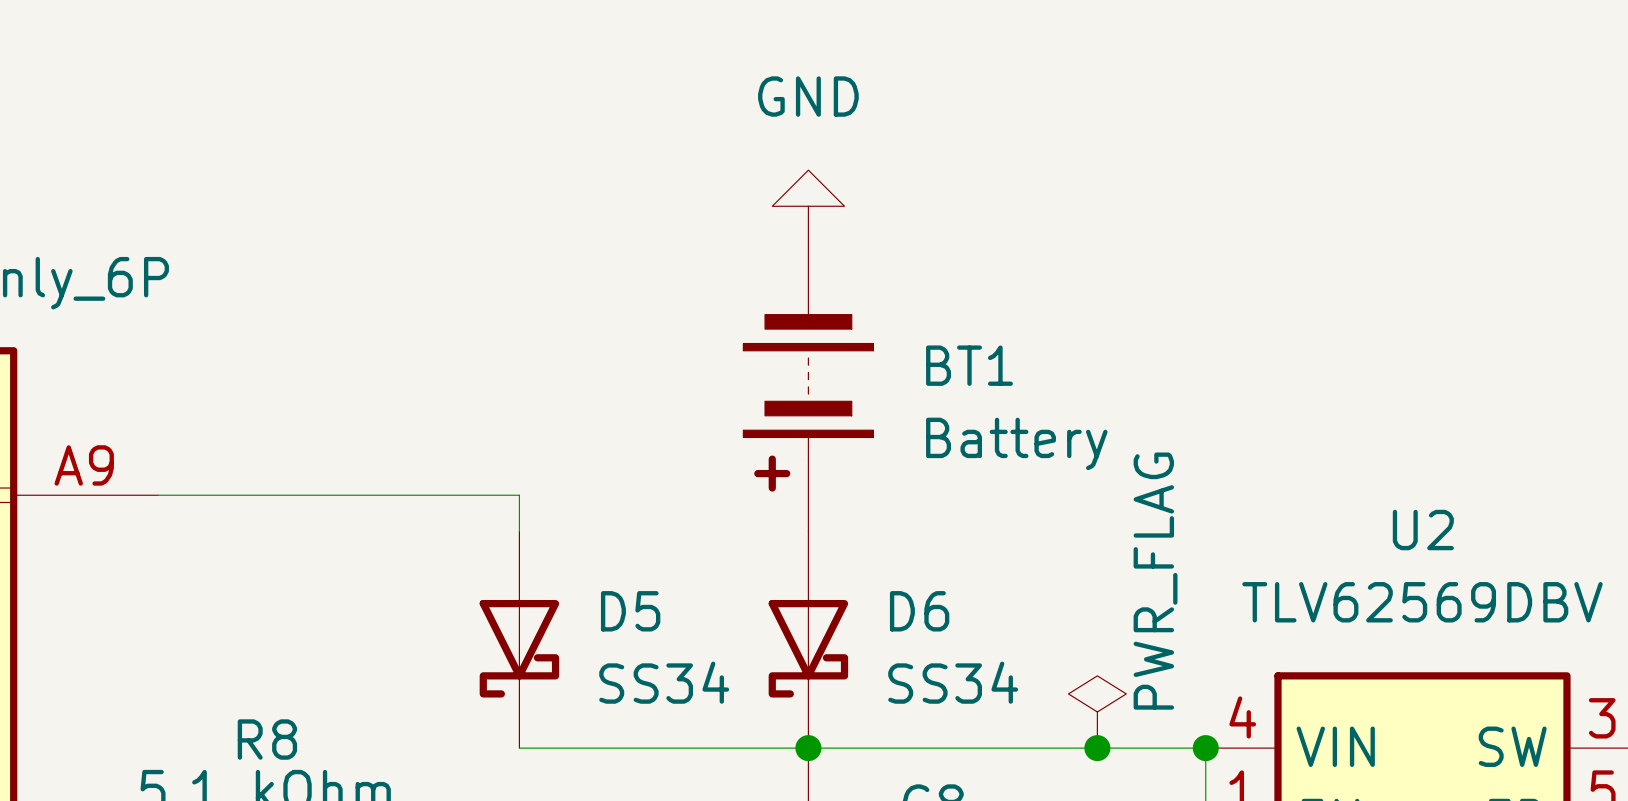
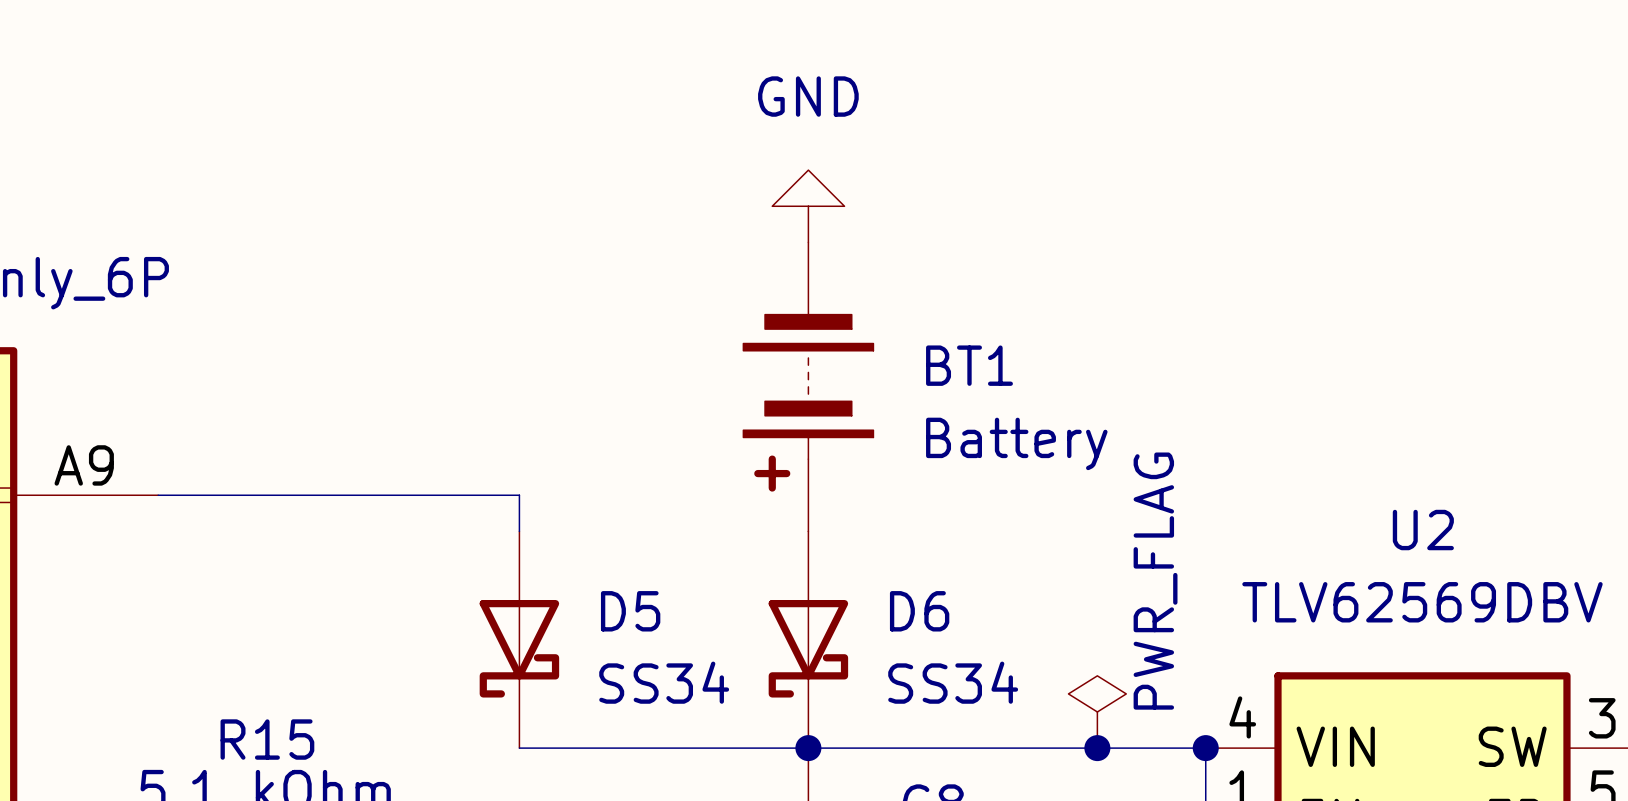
R8 name: R8 (267, 739) -> R15 (267, 739)

